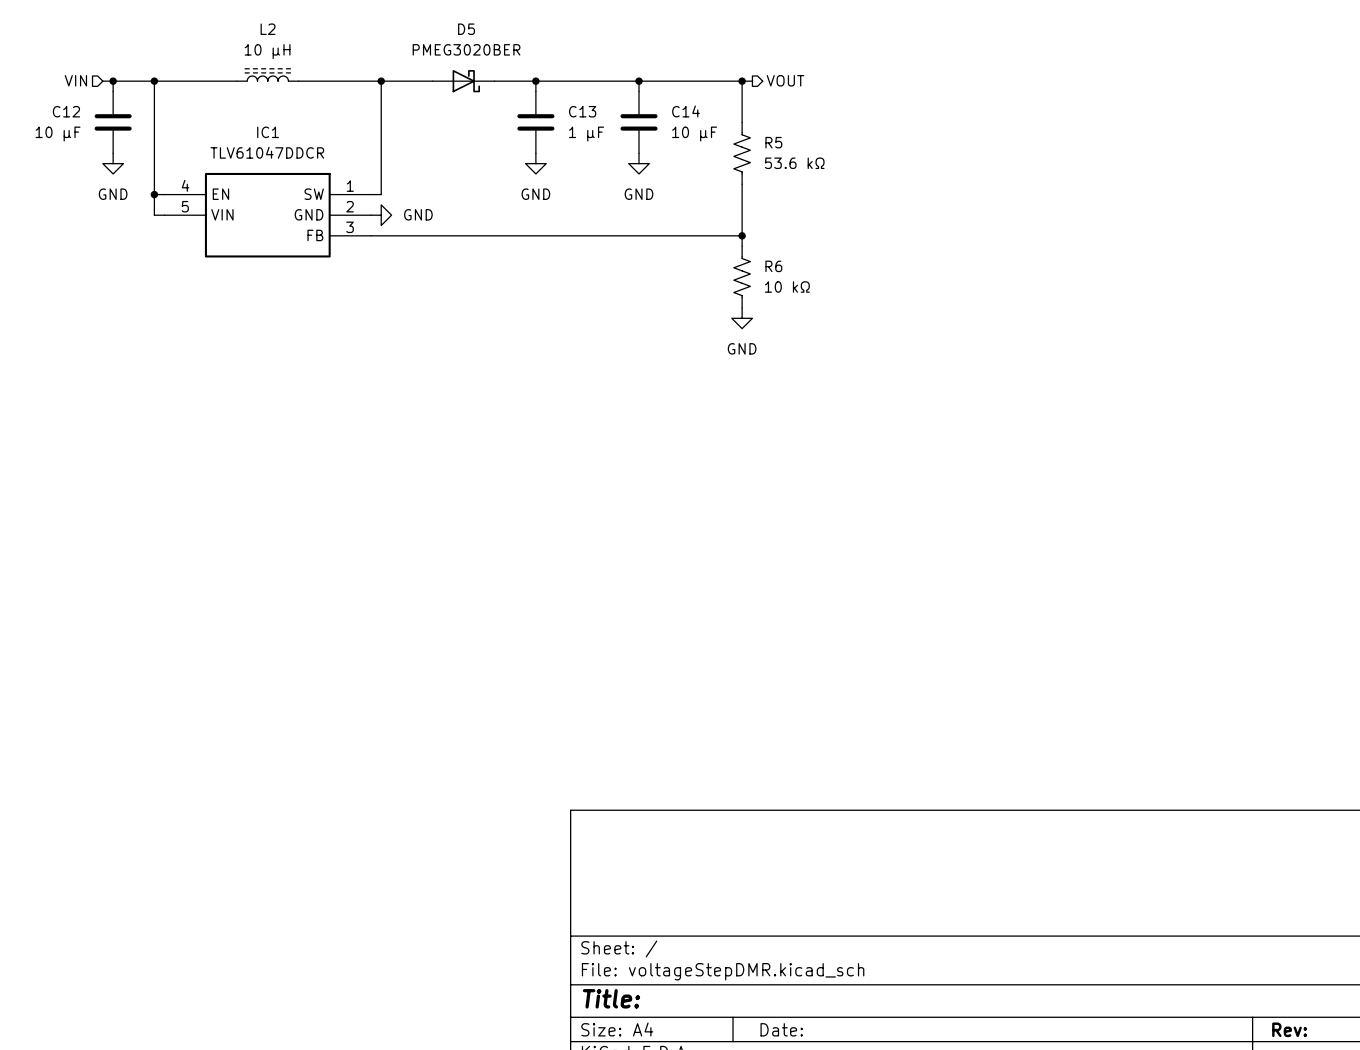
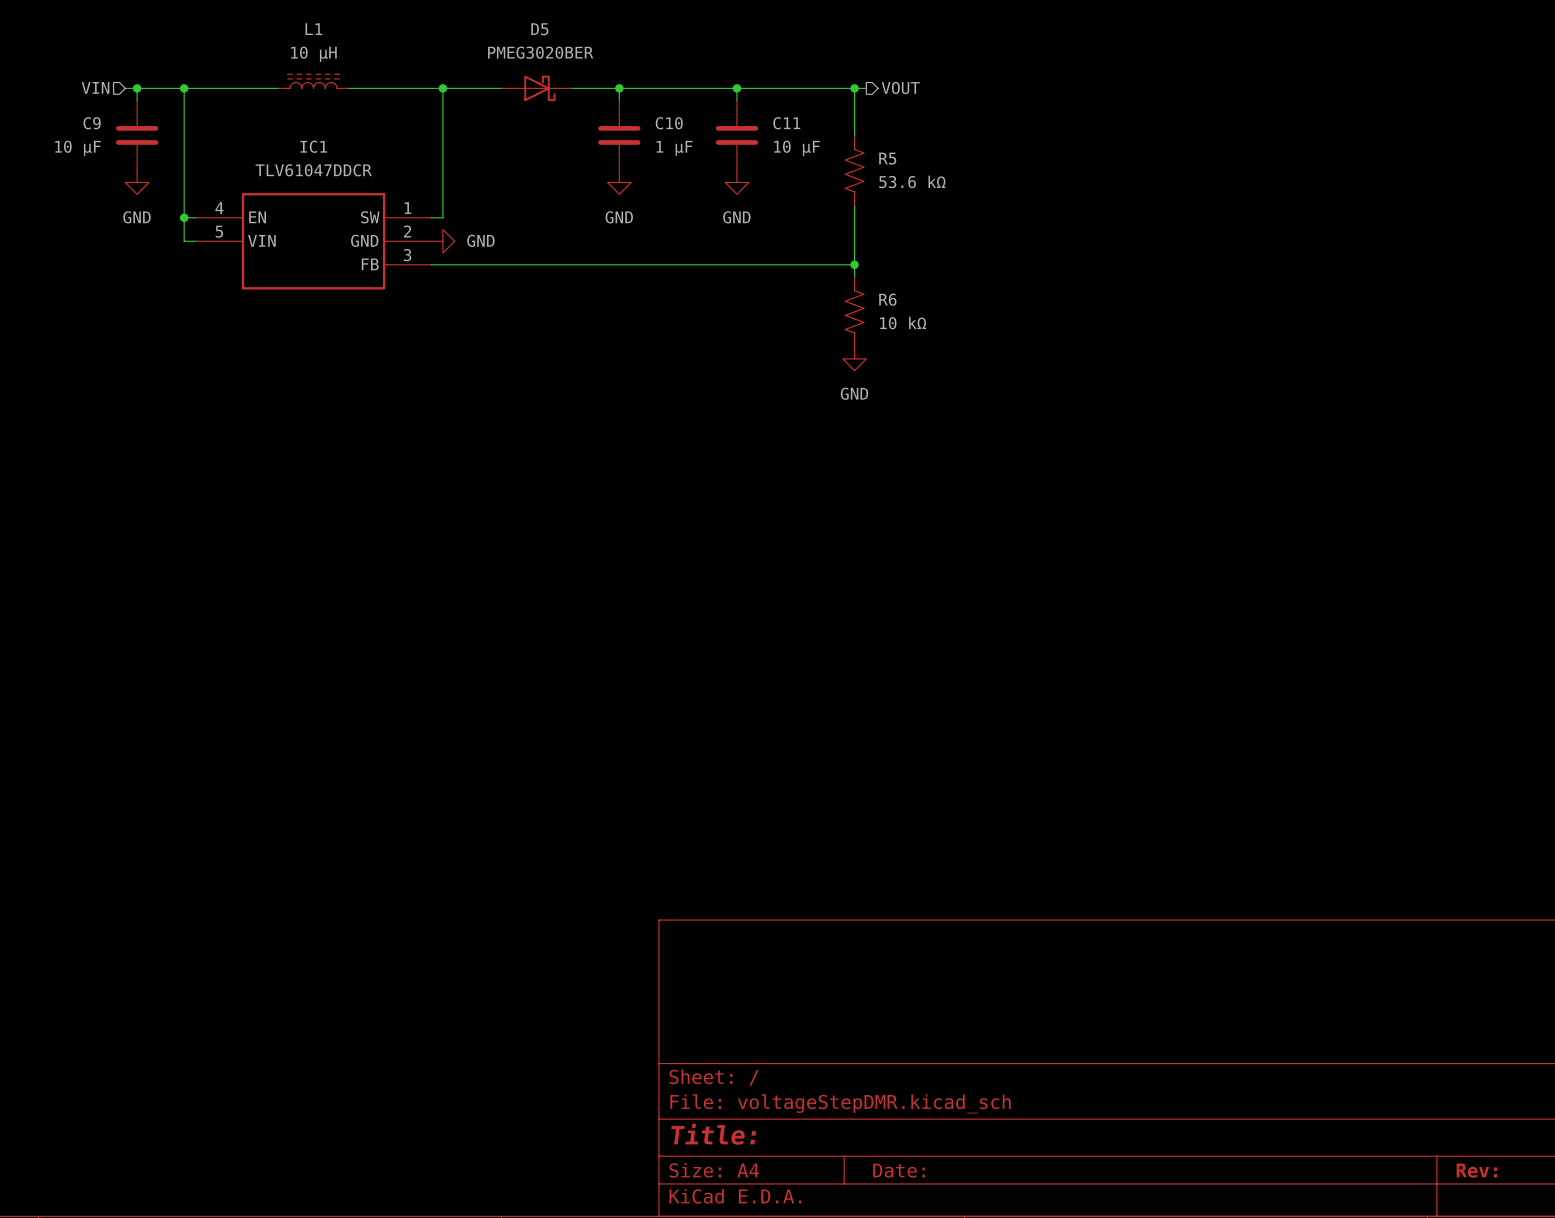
L2 name: L2 (268, 29) -> L1 (313, 29)
C12 name: C12 (66, 111) -> C9 (92, 123)
C13 name: C13 (582, 111) -> C10 (669, 123)
C14 name: C14 (685, 111) -> C11 (786, 123)

